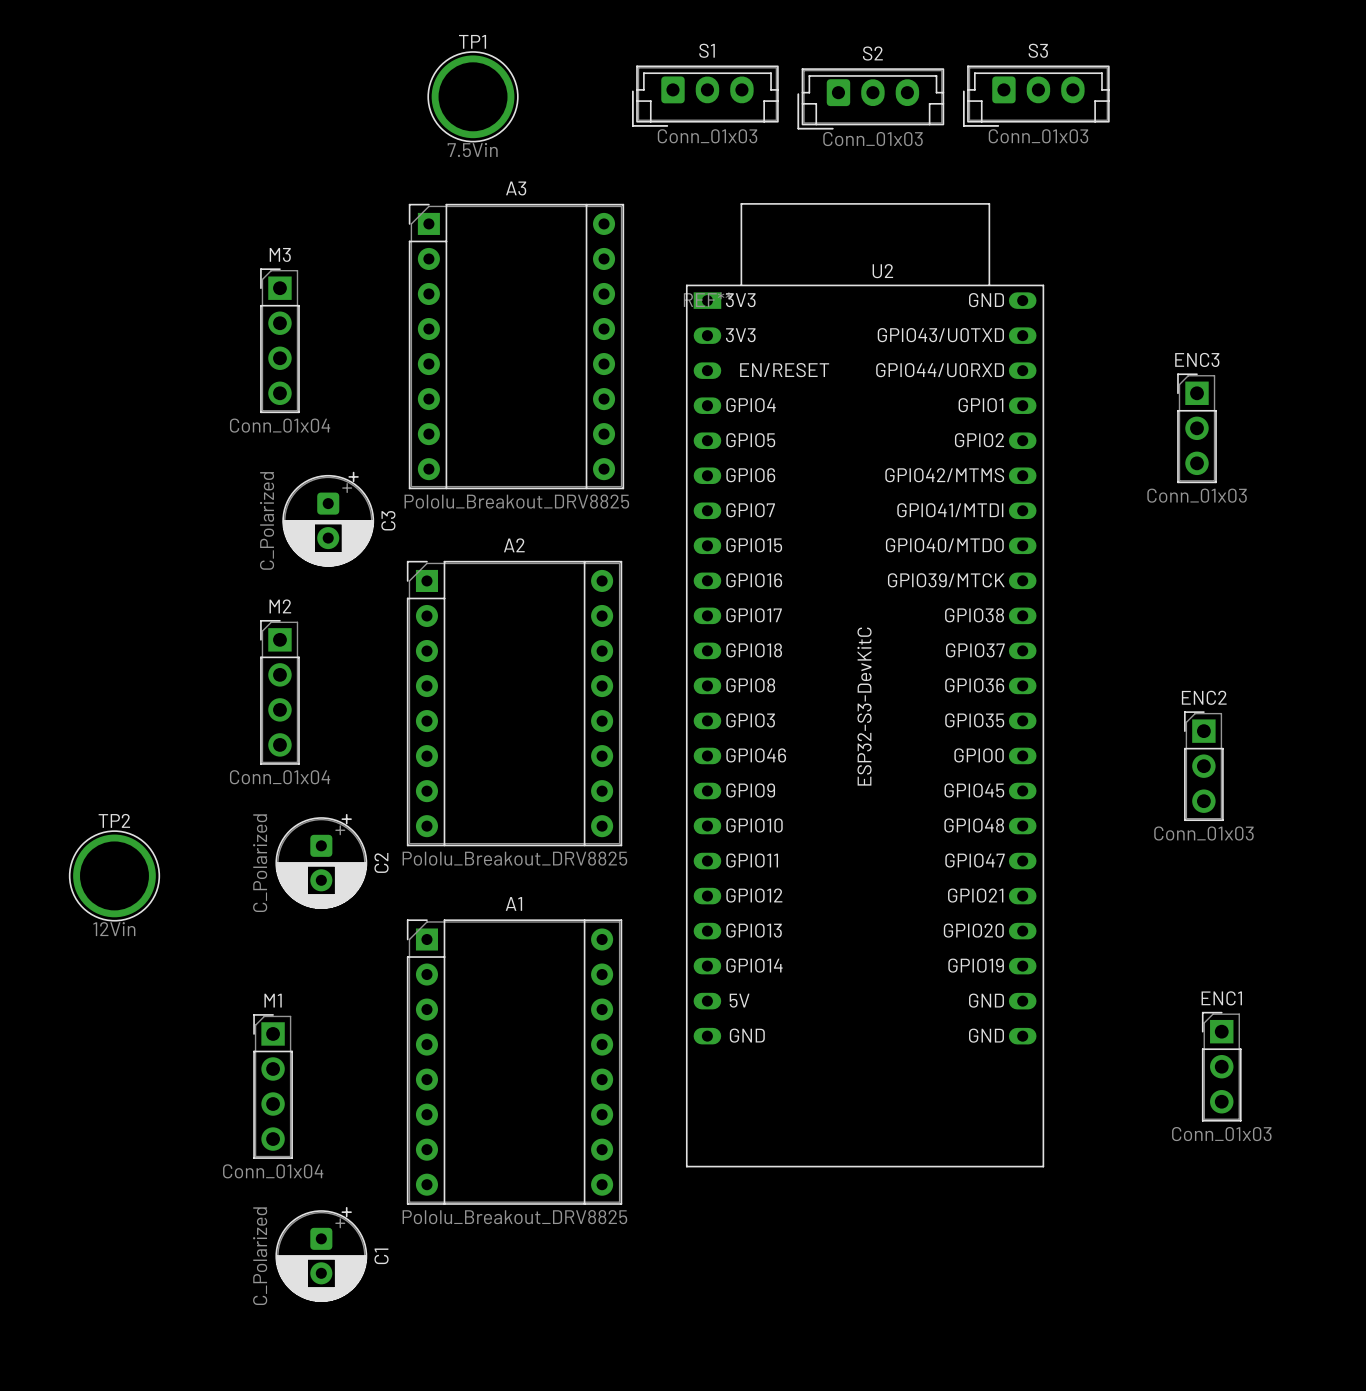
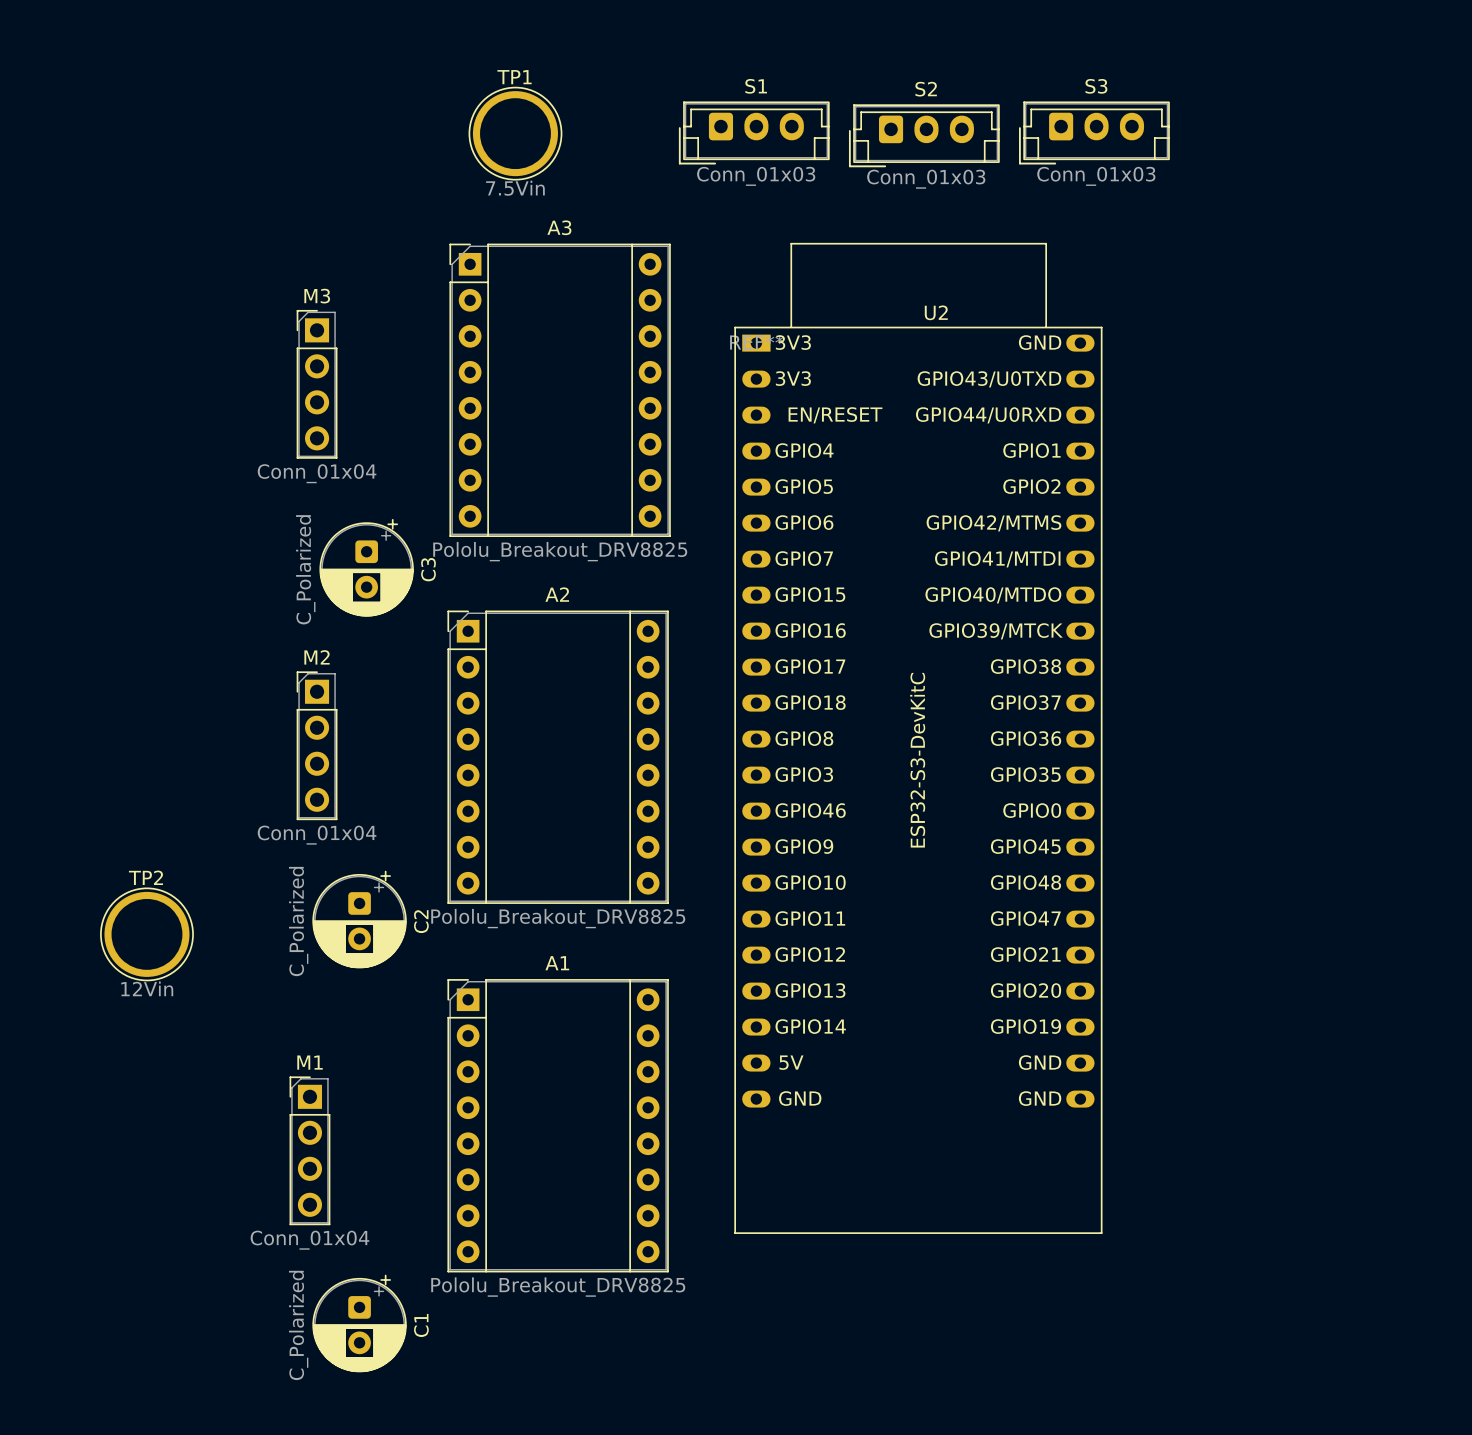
ENC3: Conn_01x03 (1197, 428) -> none
ENC2: Conn_01x03 (1203, 766) -> none
ENC1: Conn_01x03 (1221, 1066) -> none

